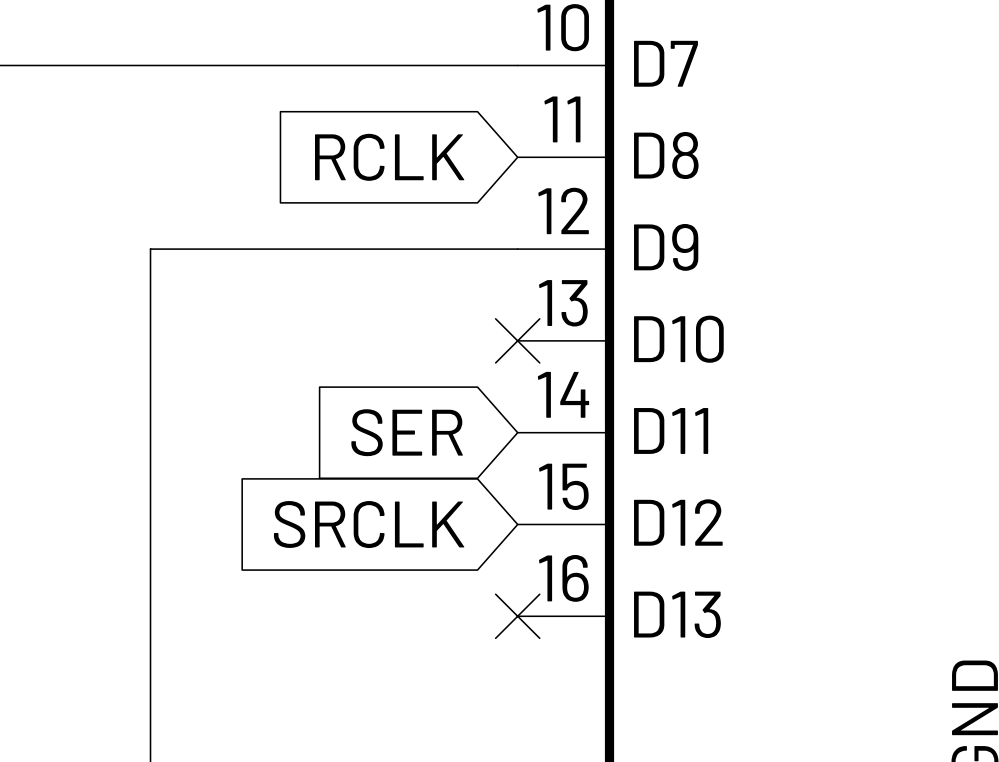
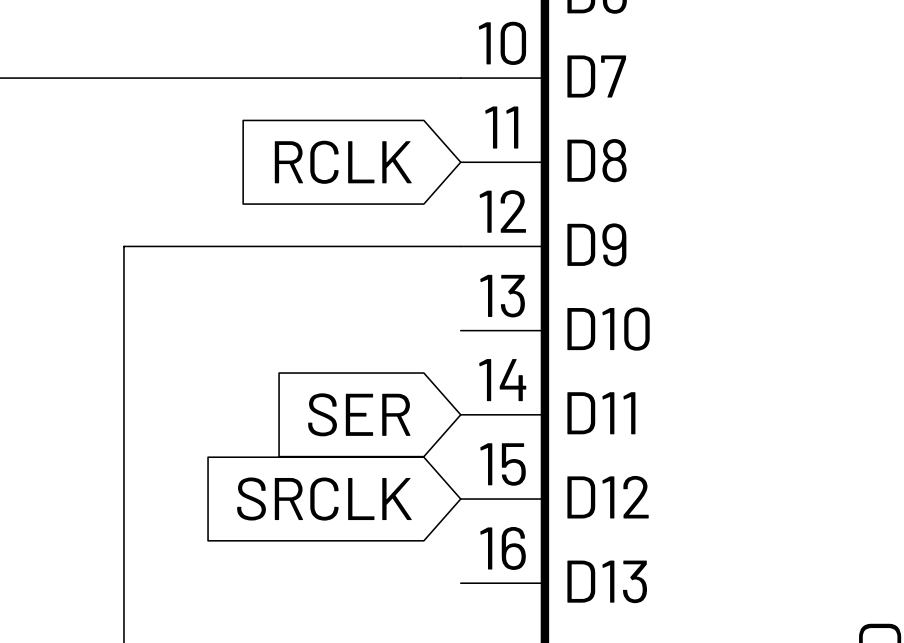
no-connect mark: (517, 340) -> none
no-connect mark: (517, 616) -> none

